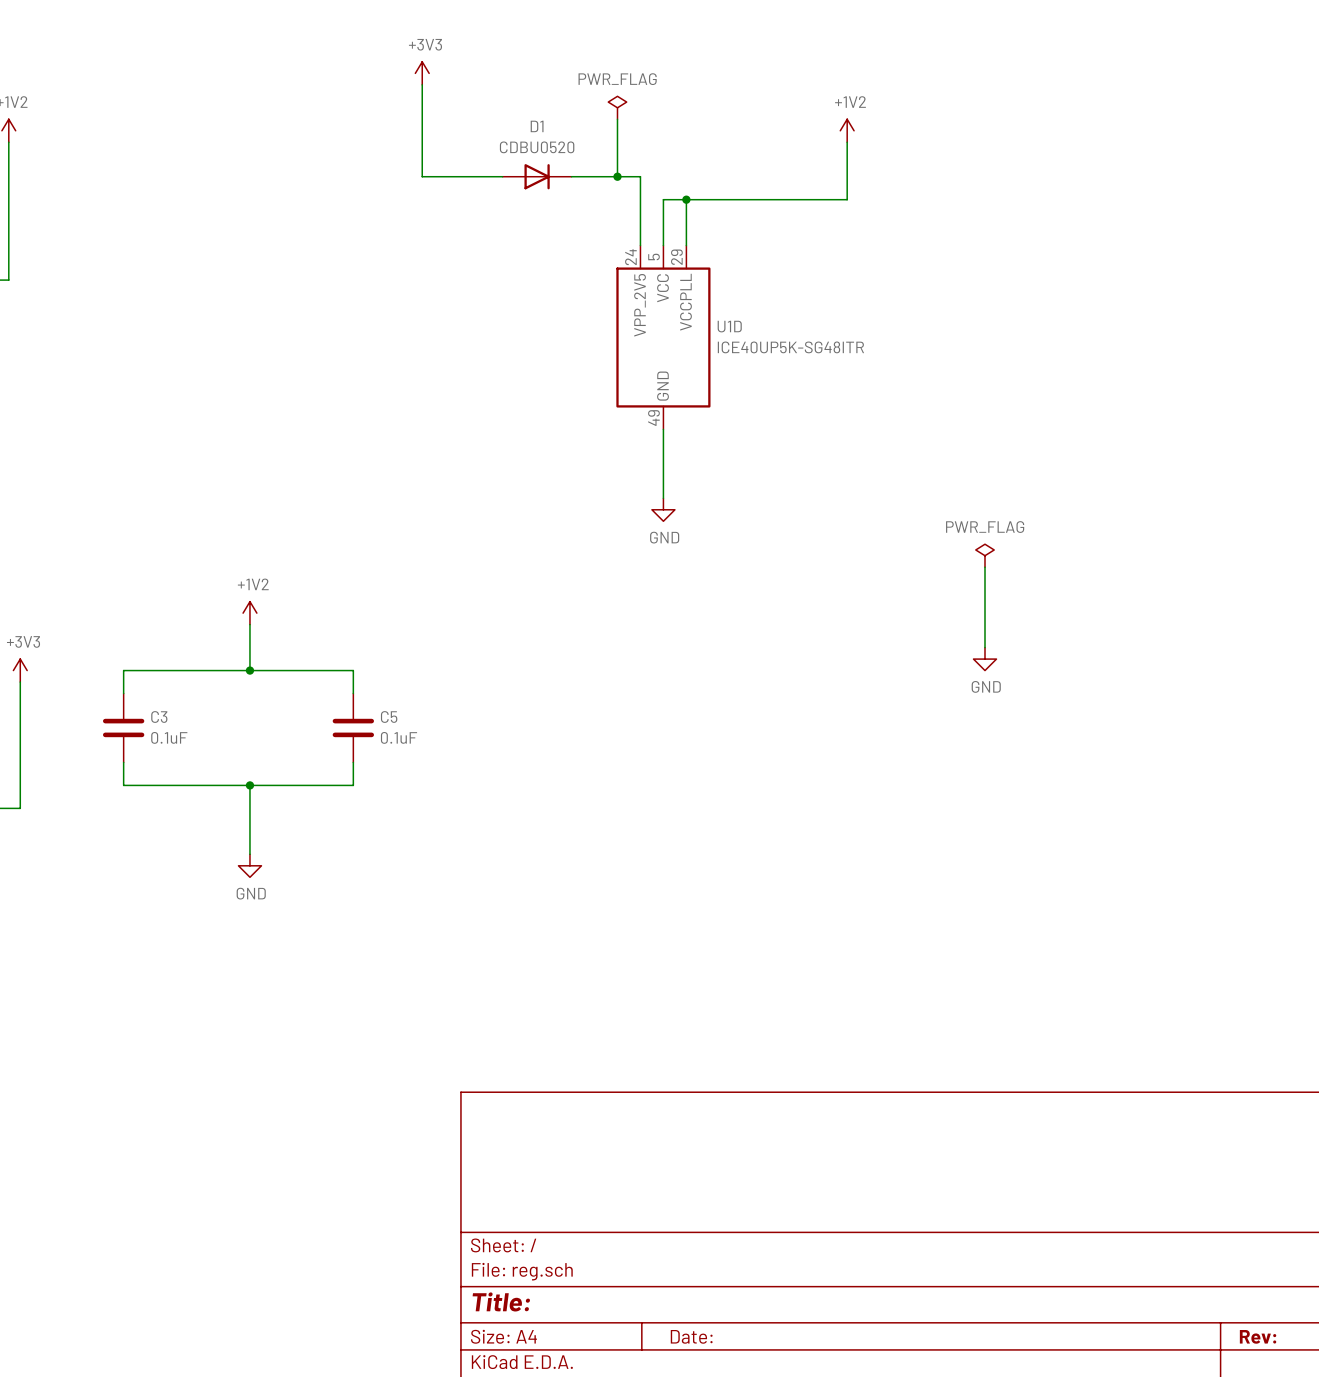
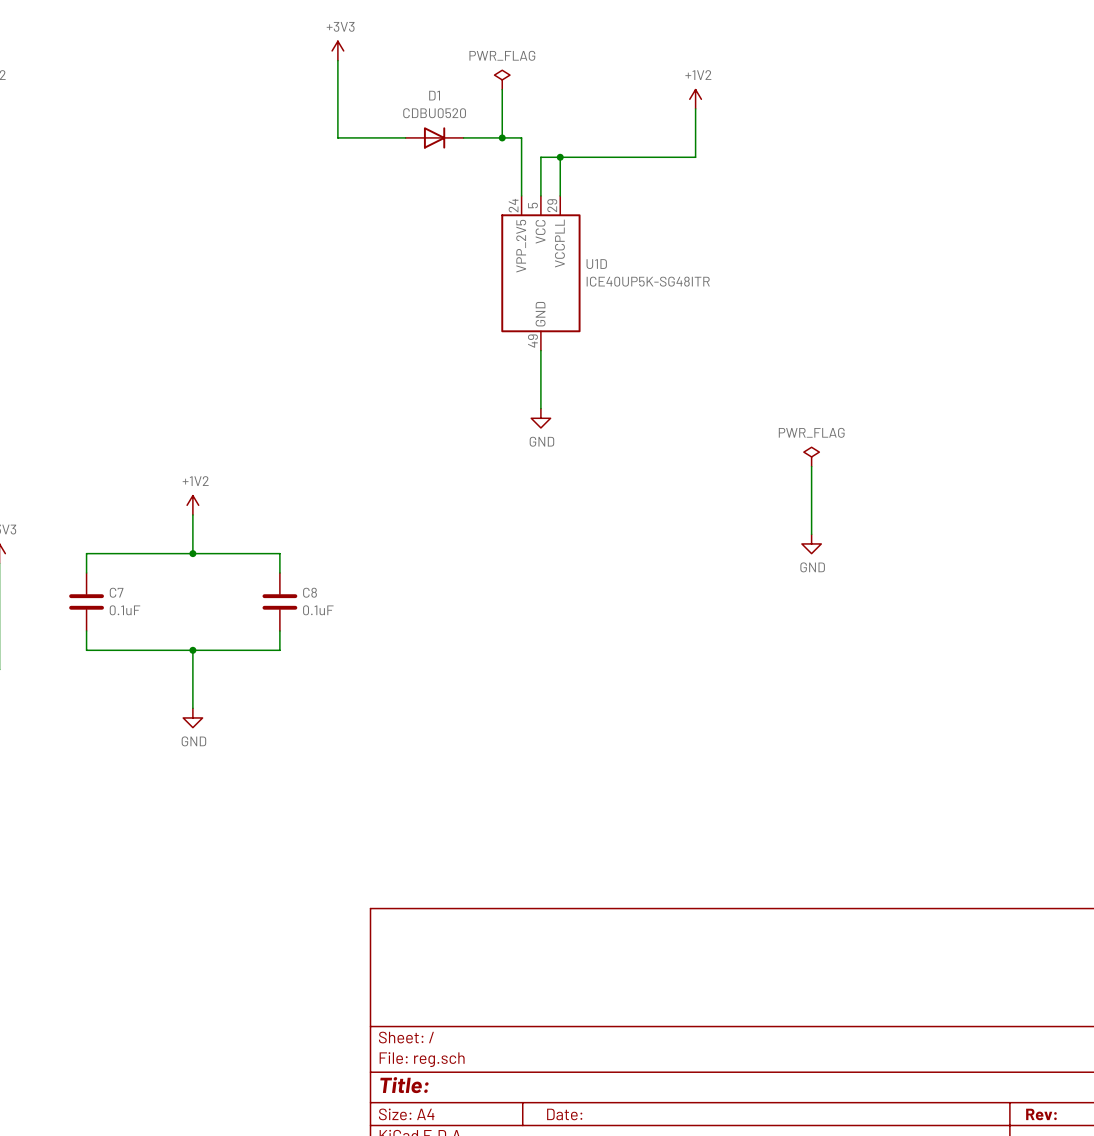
C3 name: C3 (159, 717) -> C7 (116, 592)
C5 name: C5 (389, 717) -> C8 (310, 592)

